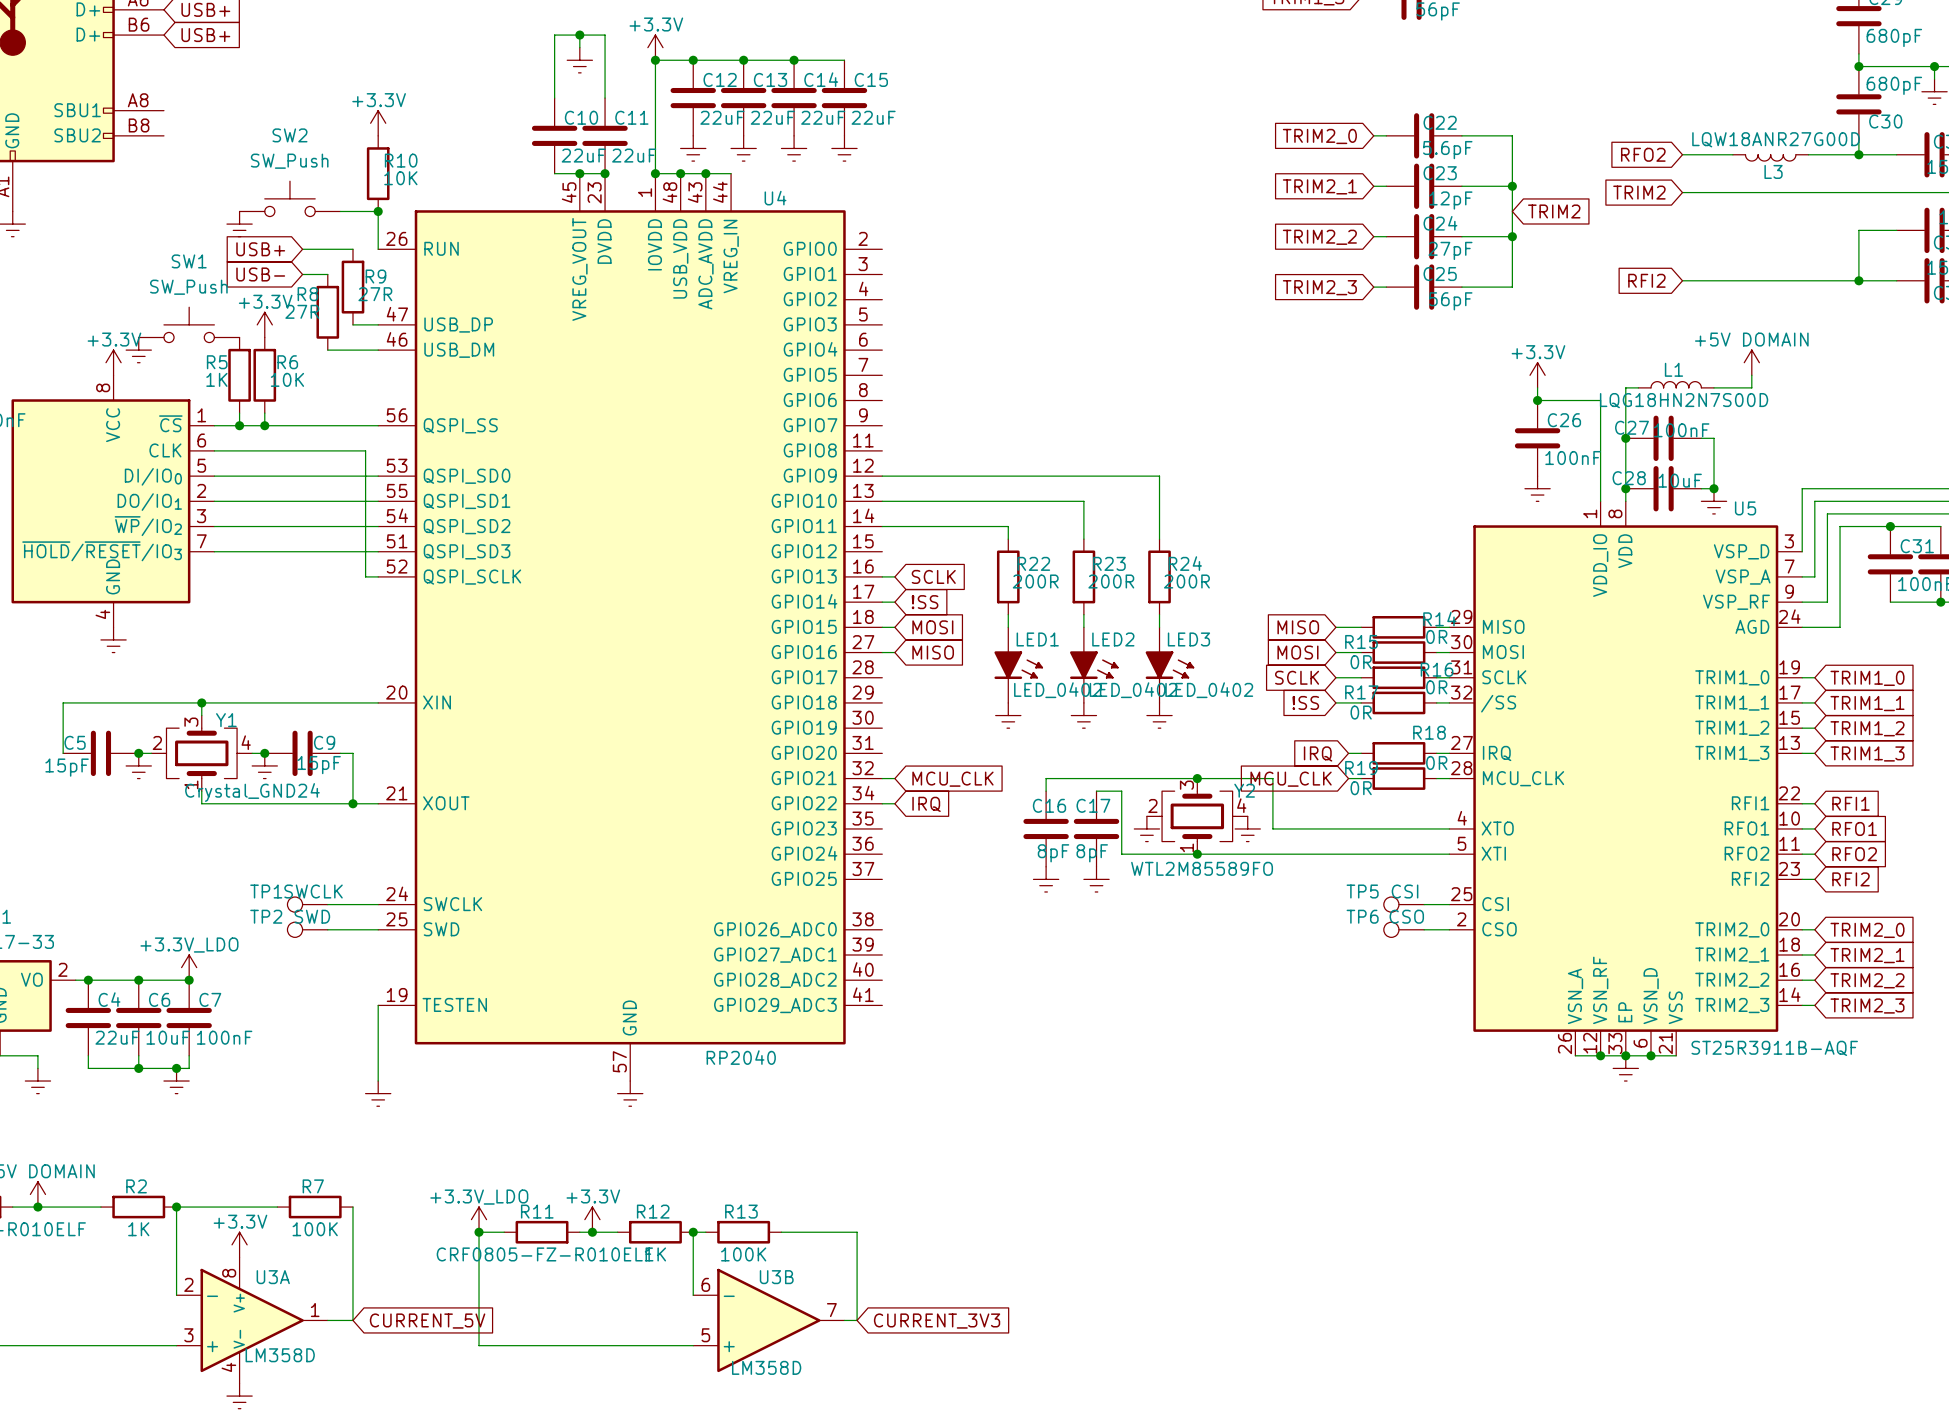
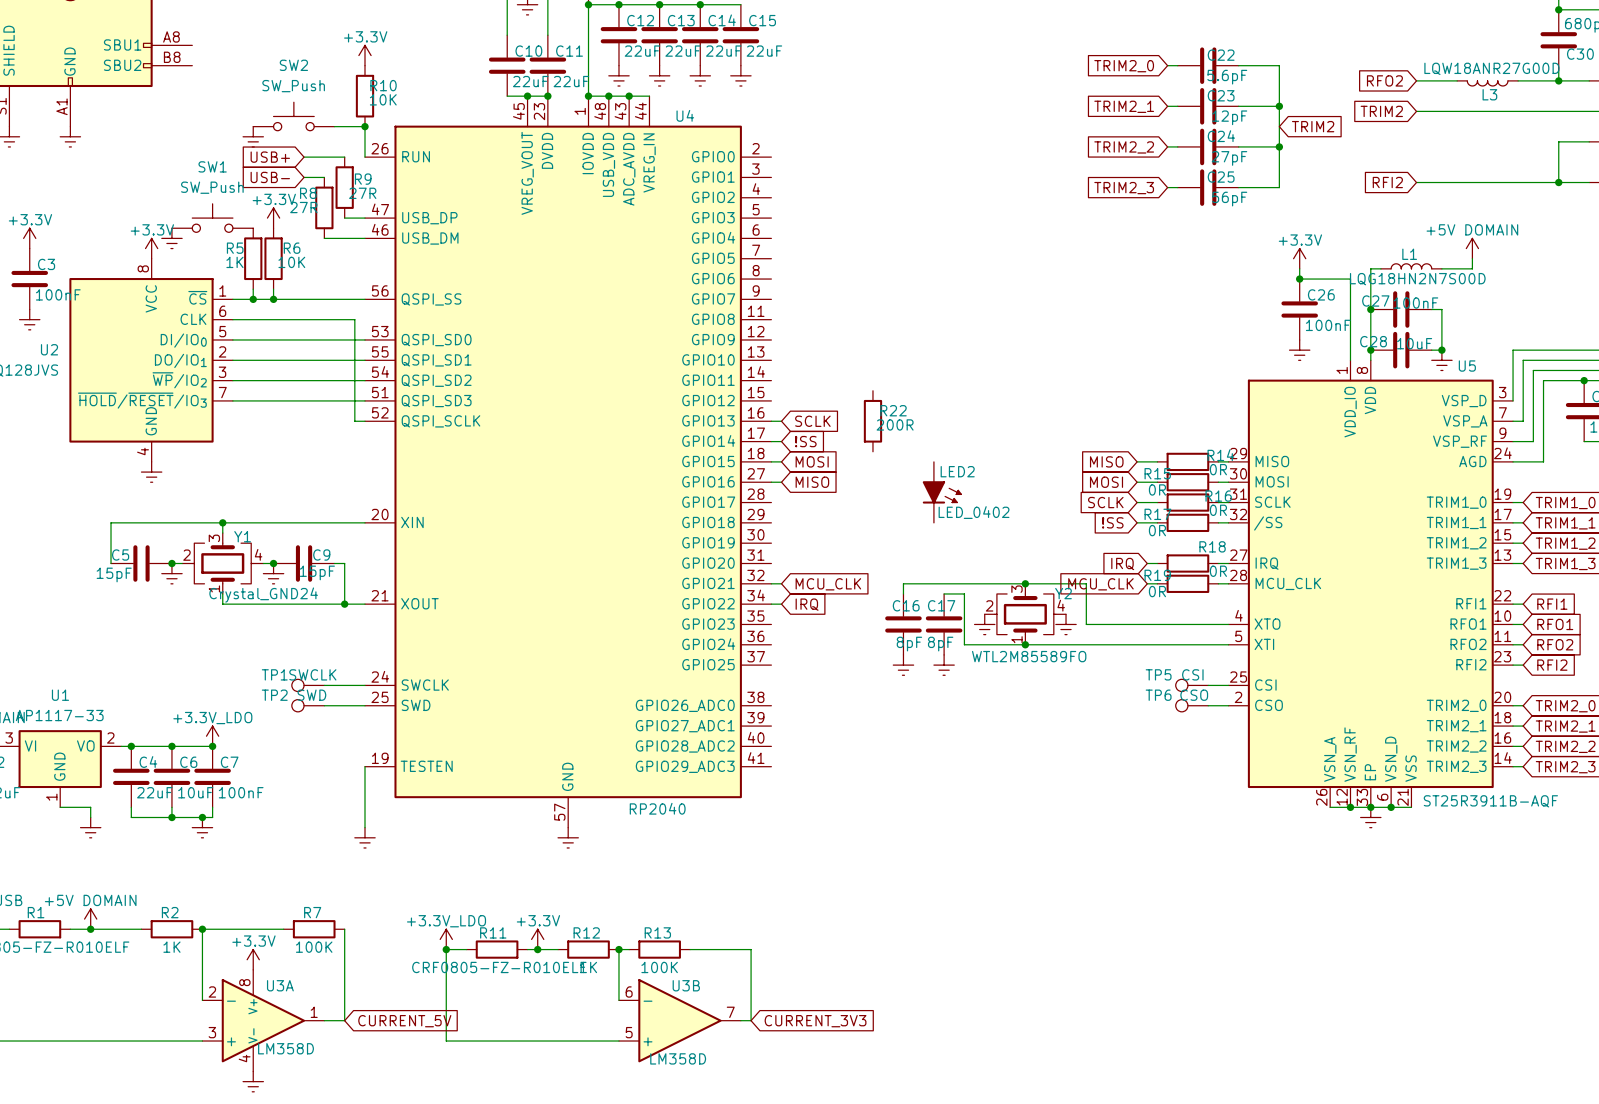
wire: (882, 476) (1159, 476) (1159, 539) -> none
wire: (882, 501) (1083, 501) (1083, 539) -> none
wire: (882, 526) (1008, 526) (1008, 539) -> none
R23: 200R (1083, 576) -> none
R24: 200R (1159, 576) -> none
wire: (1008, 614) (1008, 627) -> none
wire: (1083, 614) (1083, 627) -> none
wire: (1159, 614) (1159, 627) -> none
LED1: LED_0402 (1018, 665) -> none
LED3: LED_0402 (1169, 665) -> none
power symbol: (1008, 715) -> none
power symbol: (1083, 715) -> none
power symbol: (1159, 715) -> none

